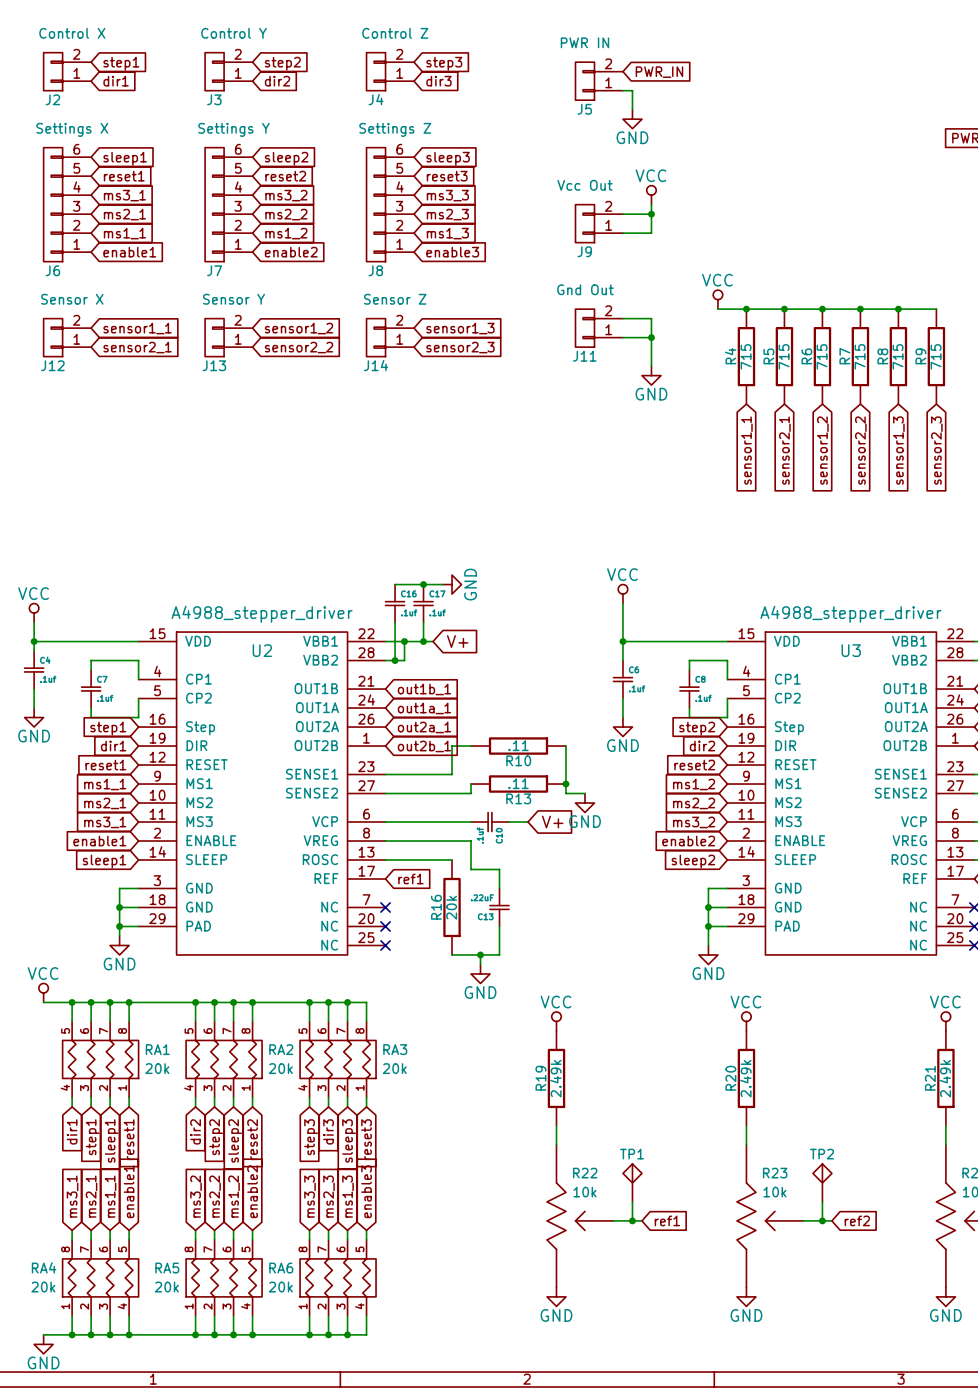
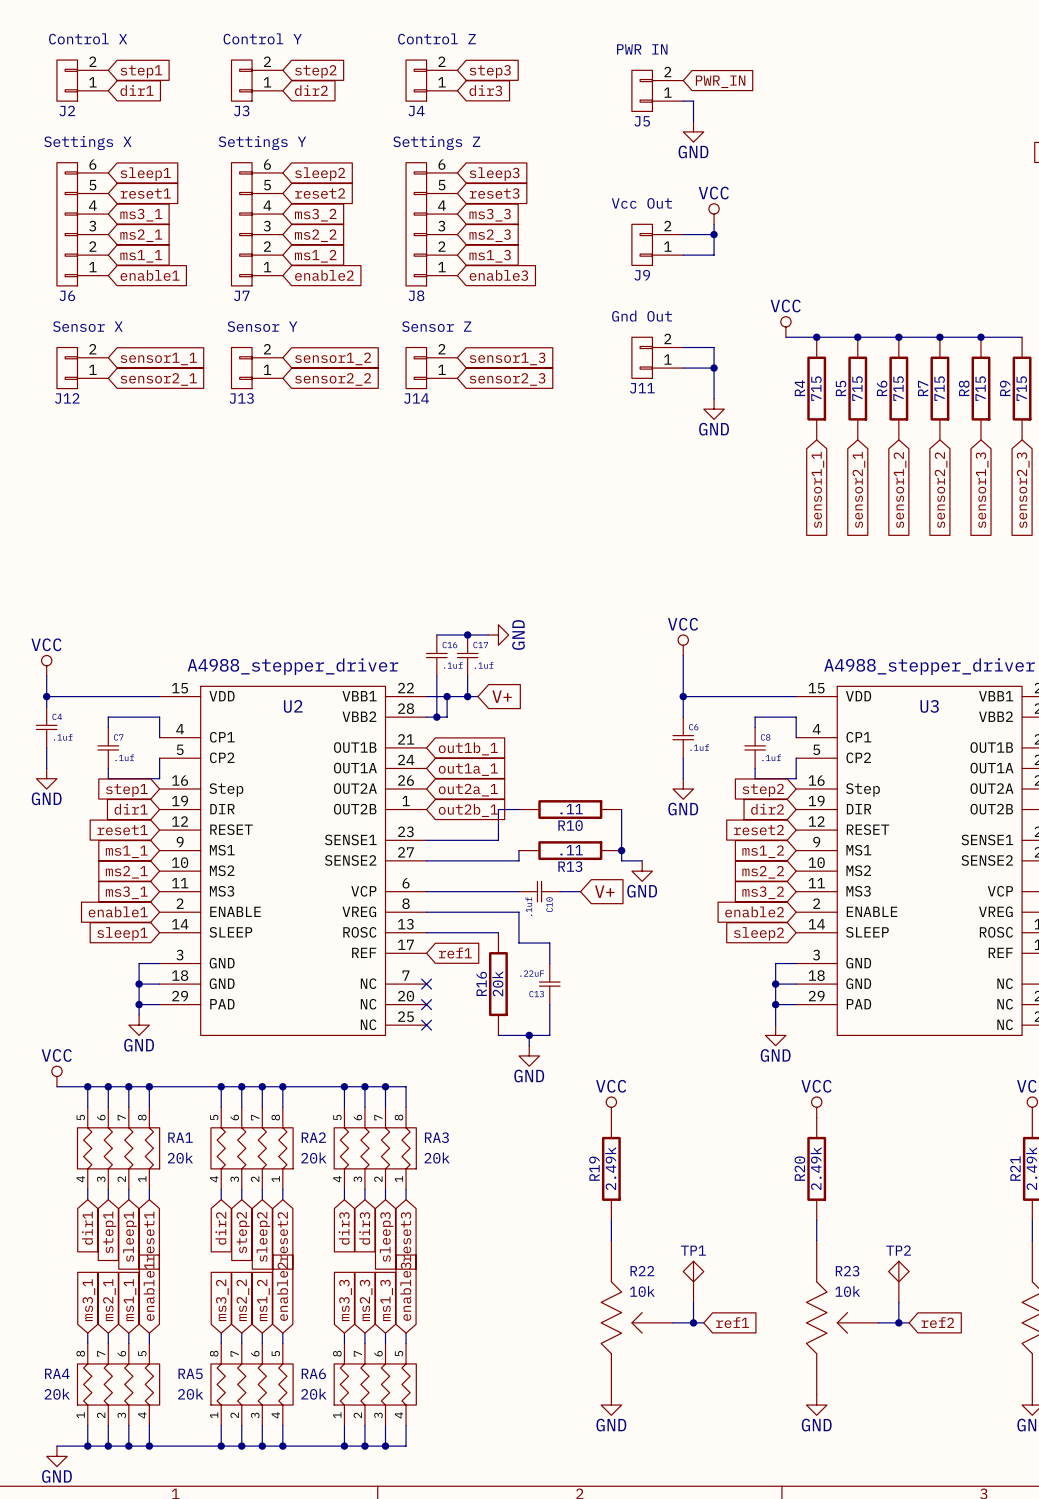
global label: step3 (311, 1137) -> dir3 (344, 1228)

